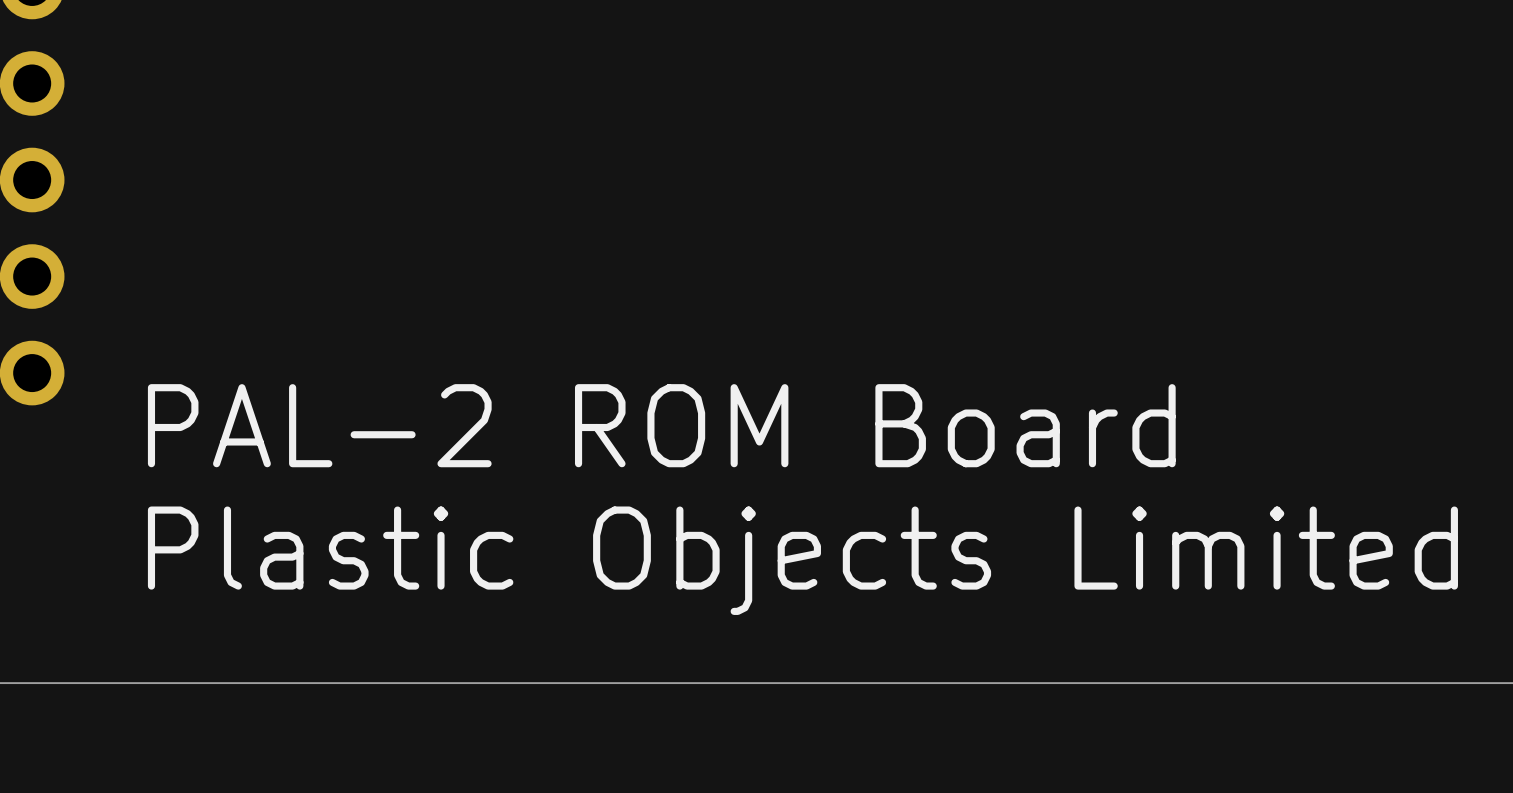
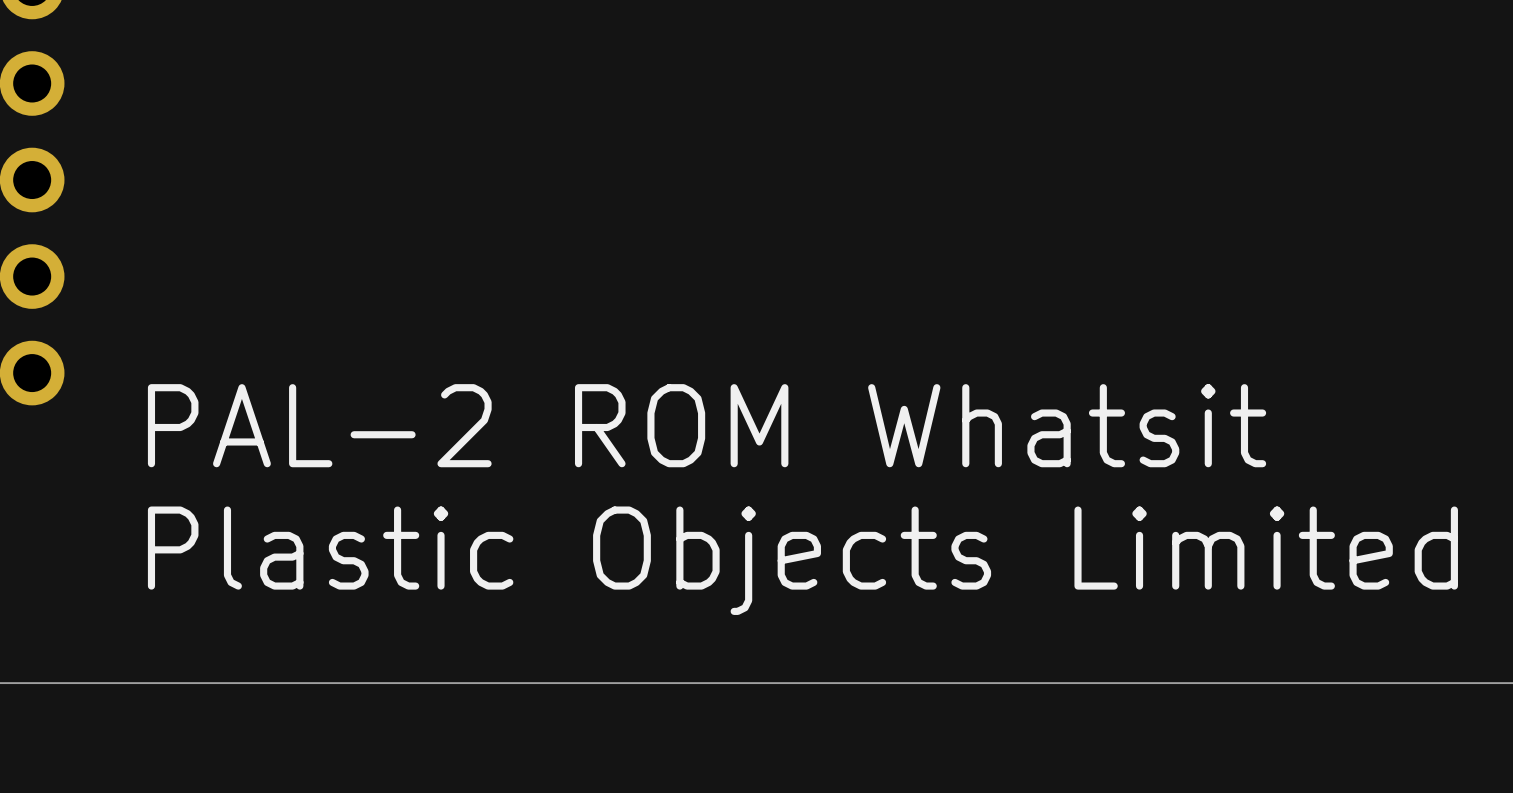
text: PAL-2 ROM Board (661, 425) -> PAL-2 ROM Whatsit (707, 425)

